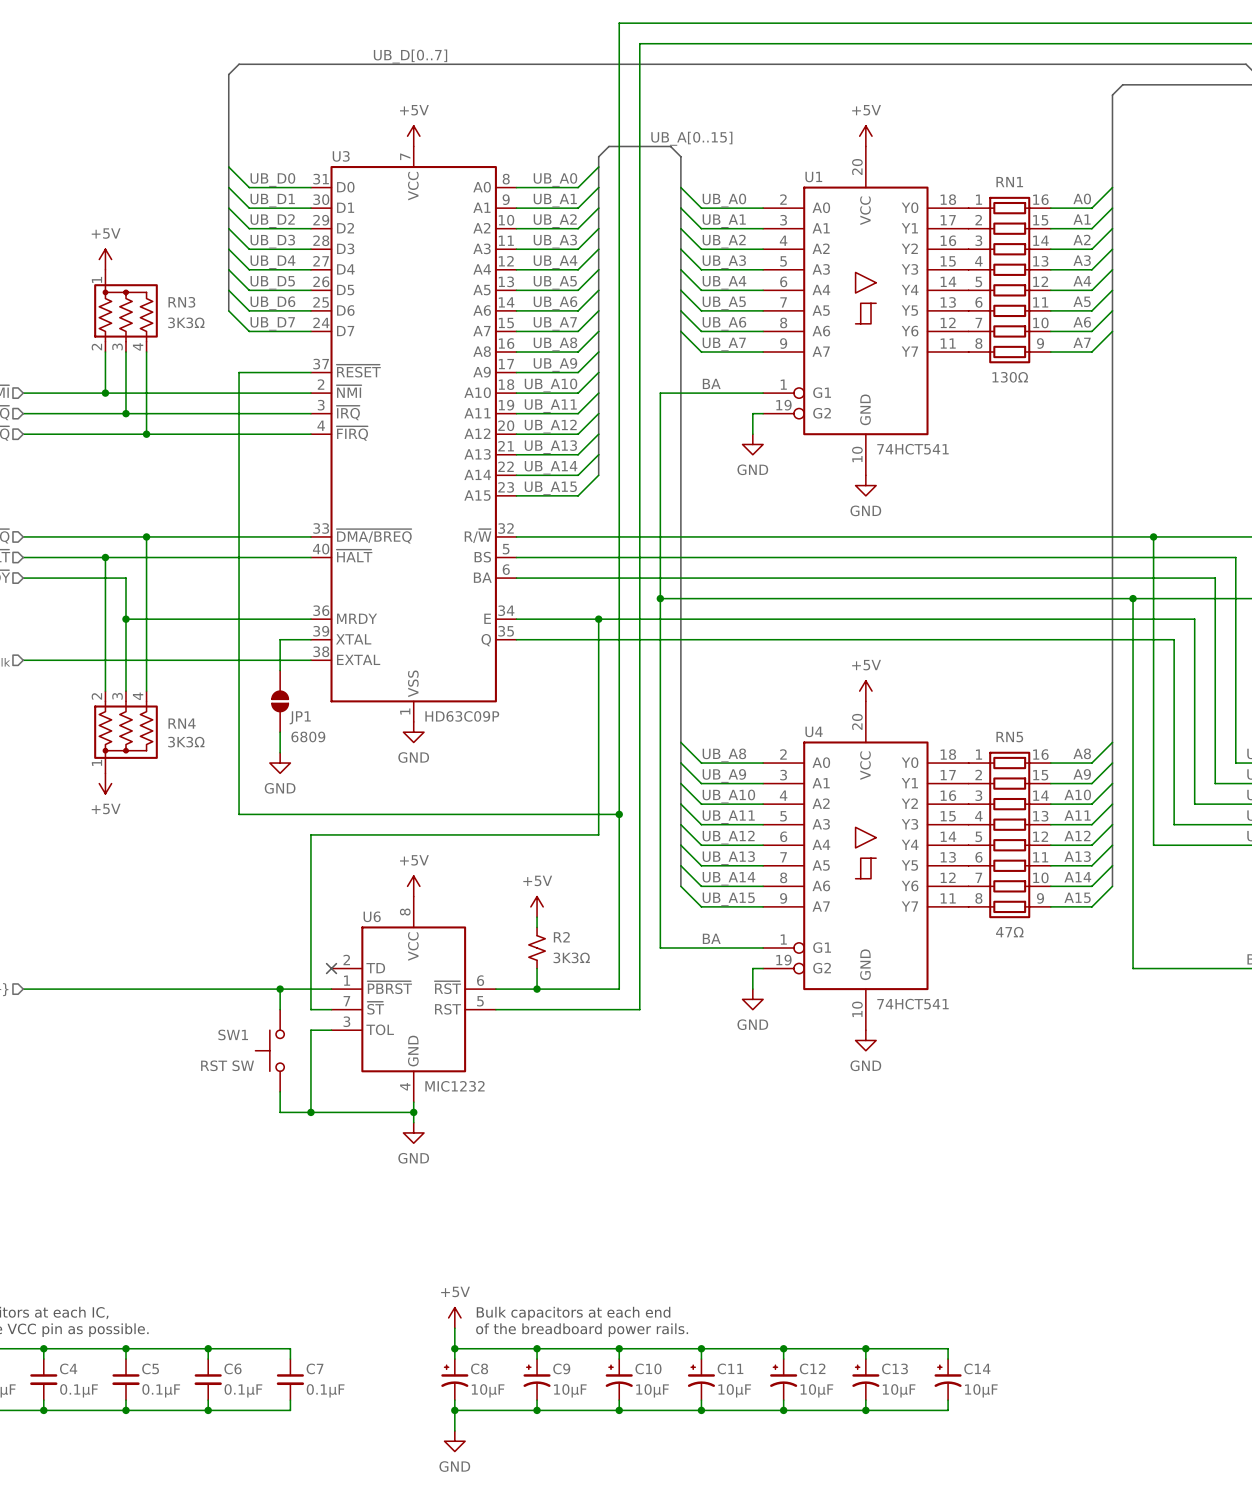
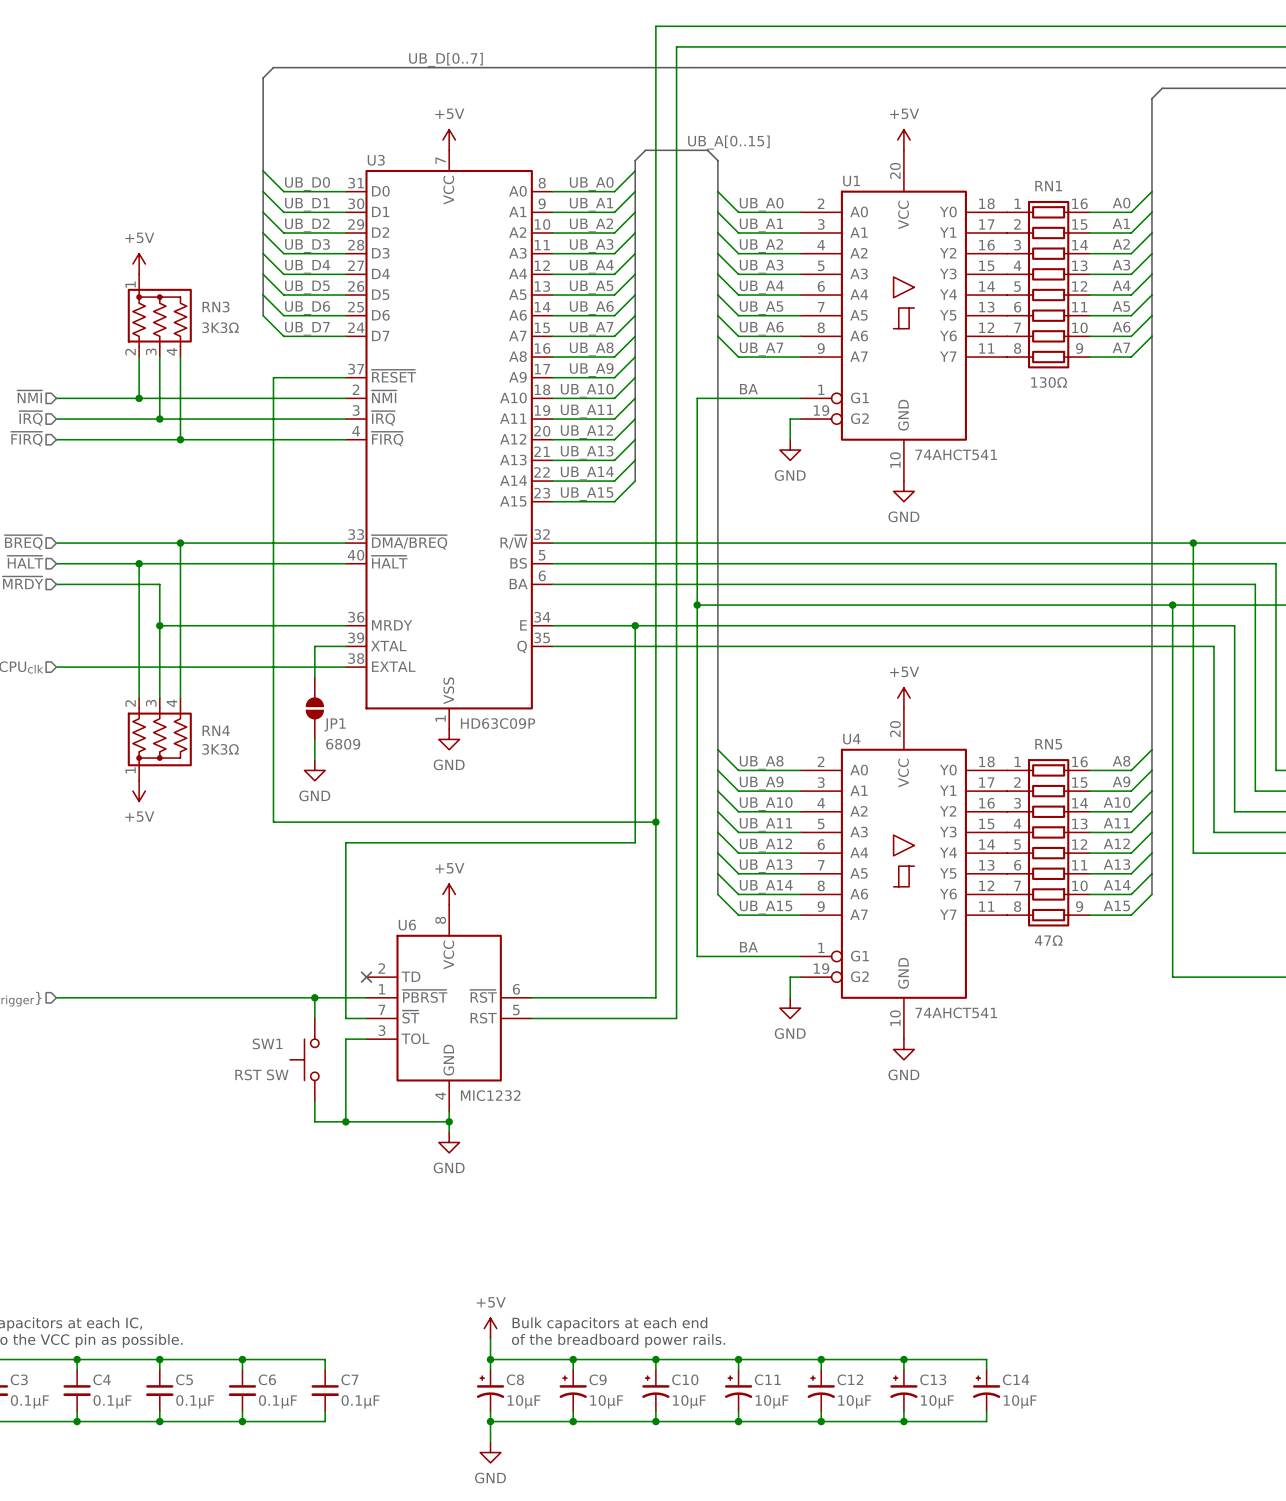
U1 value: 74HCT541 (913, 449) -> 74AHCT541 (956, 454)
power symbol: +5V (537, 906) -> none
wire: (537, 917) (537, 927) -> none
R2: 3K3Ω (537, 947) -> none
wire: (537, 968) (537, 989) -> none
junction: (537, 989) -> none
U4 value: 74HCT541 (913, 1004) -> 74AHCT541 (956, 1012)

